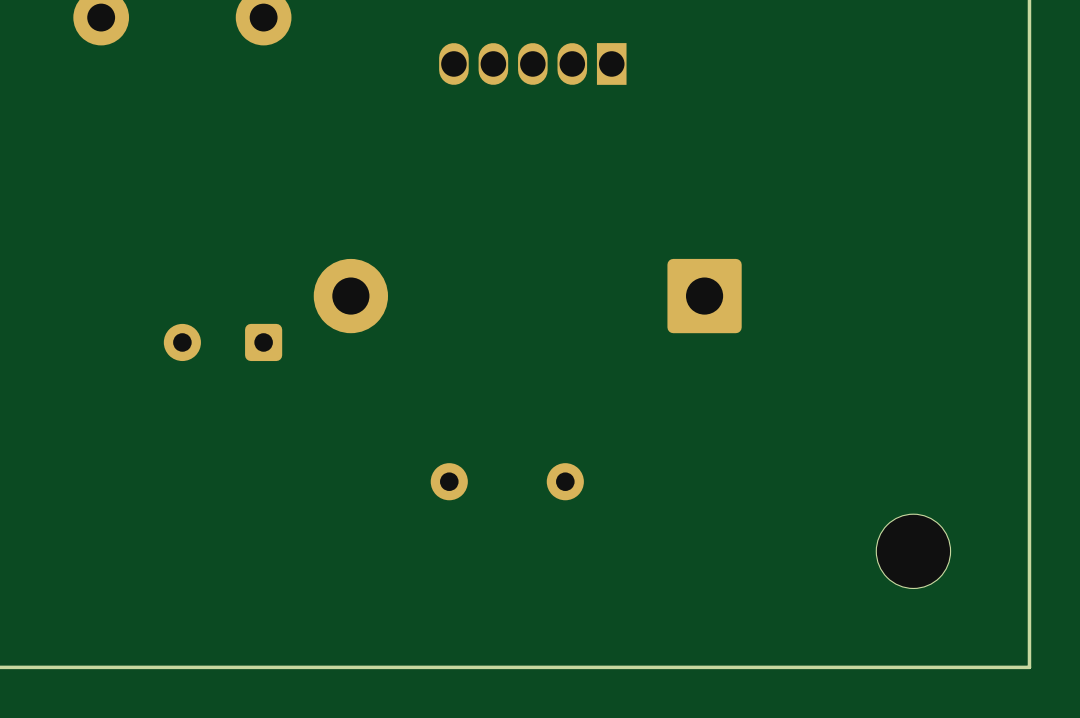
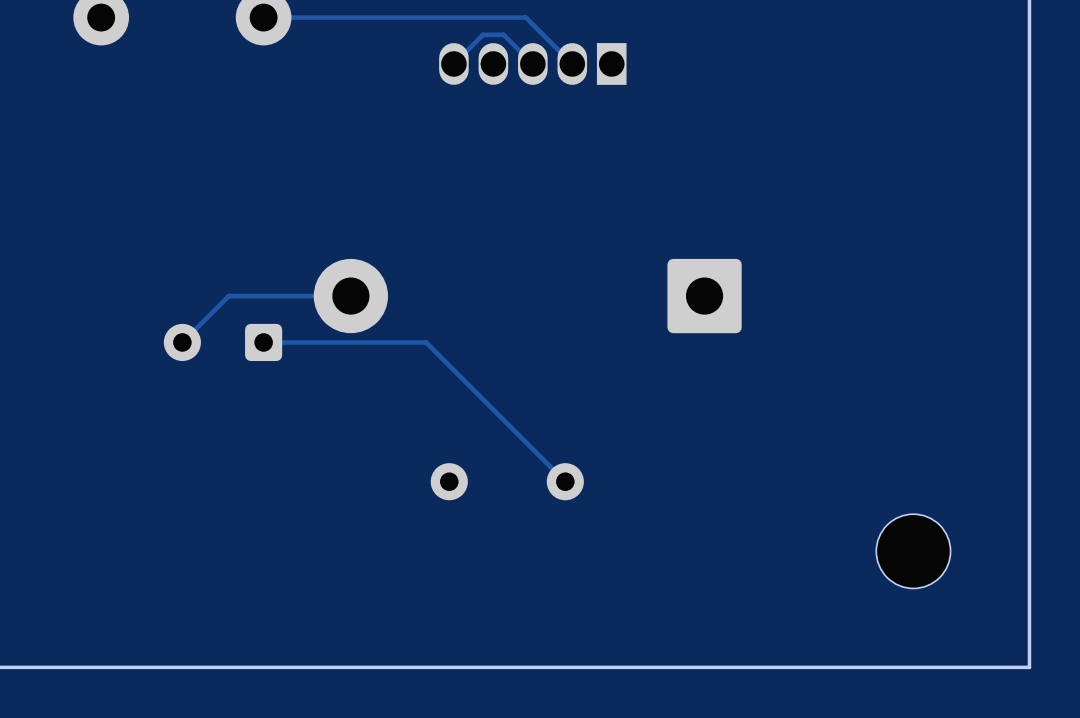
track: none -> (263, 17) (525, 17) (572, 63)
track: none -> (532, 63) (503, 34) (483, 34) (453, 63)
track: none -> (350, 296) (228, 296) (182, 342)
track: none -> (263, 342) (426, 342) (565, 481)

